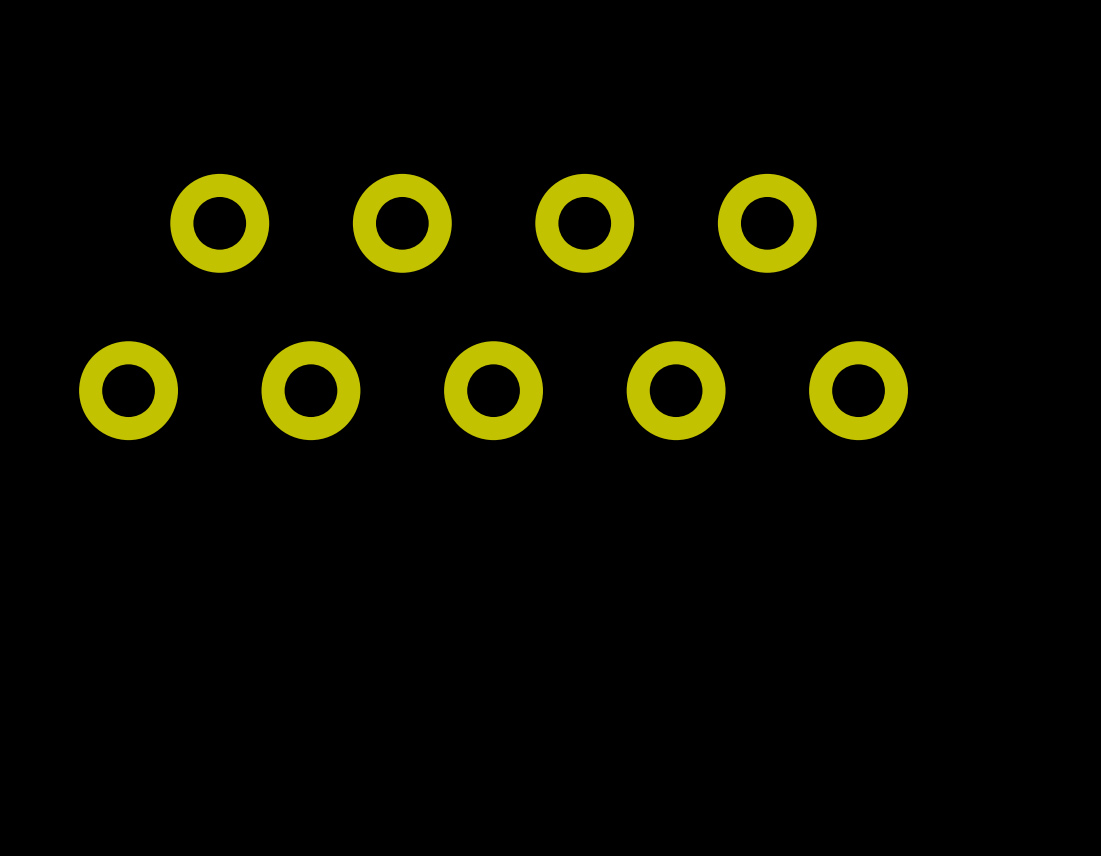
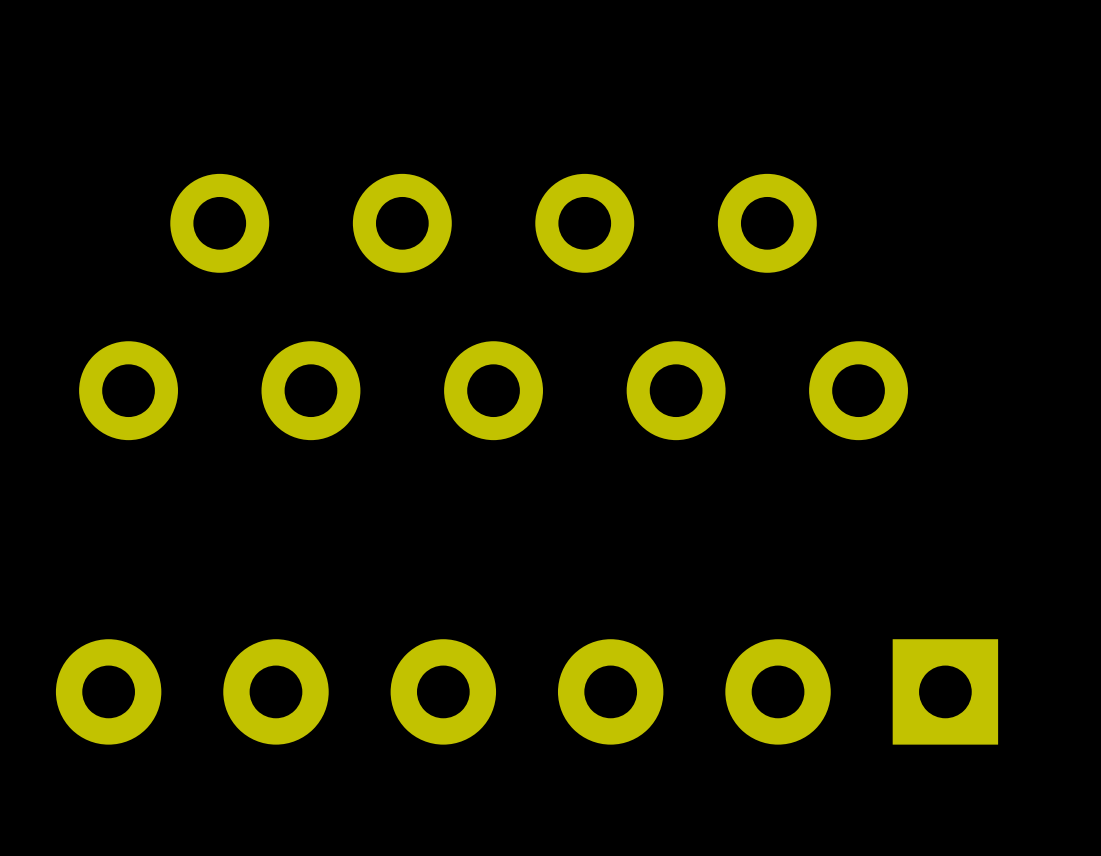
part: none -> (527, 691)

